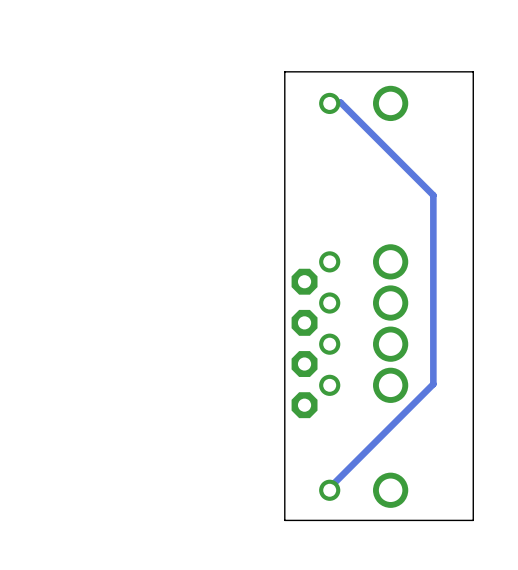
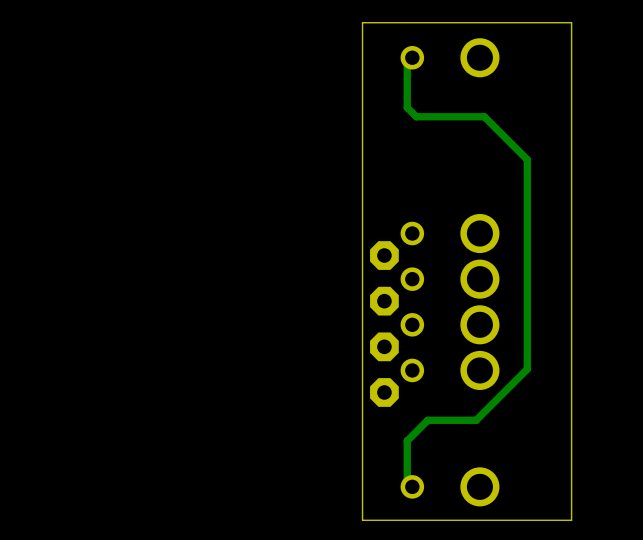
track: (325, 102) (340, 102) (394, 156) -> (407, 56) (407, 107) (416, 116) (484, 116)
track: (387, 430) (328, 489) (325, 489) -> (476, 420) (427, 420) (407, 440) (407, 486)

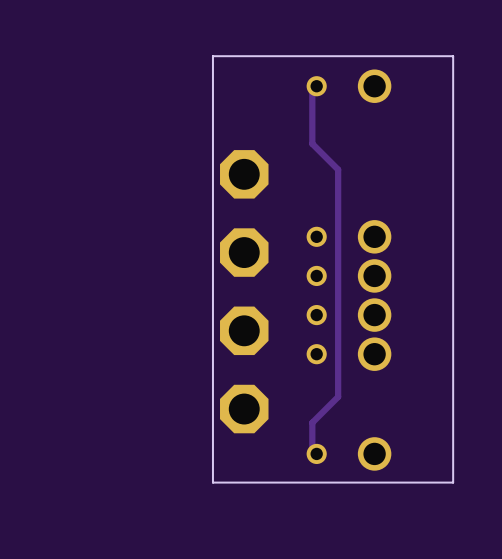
board edge: (362, 22) (362, 520) -> (273, 56) (212, 56) (212, 482) (273, 482)
track: (407, 107) (416, 116) (484, 116) (527, 159) (527, 369) (476, 420) (427, 420) (407, 440) (407, 450) -> (312, 128) (312, 143) (338, 169) (338, 396) (312, 422)
part: none -> (244, 174)
part: none -> (244, 252)
part: (384, 255) -> none
part: (384, 301) -> none
part: none -> (244, 330)
part: (384, 346) -> none
part: (384, 392) -> none
part: none -> (244, 409)

